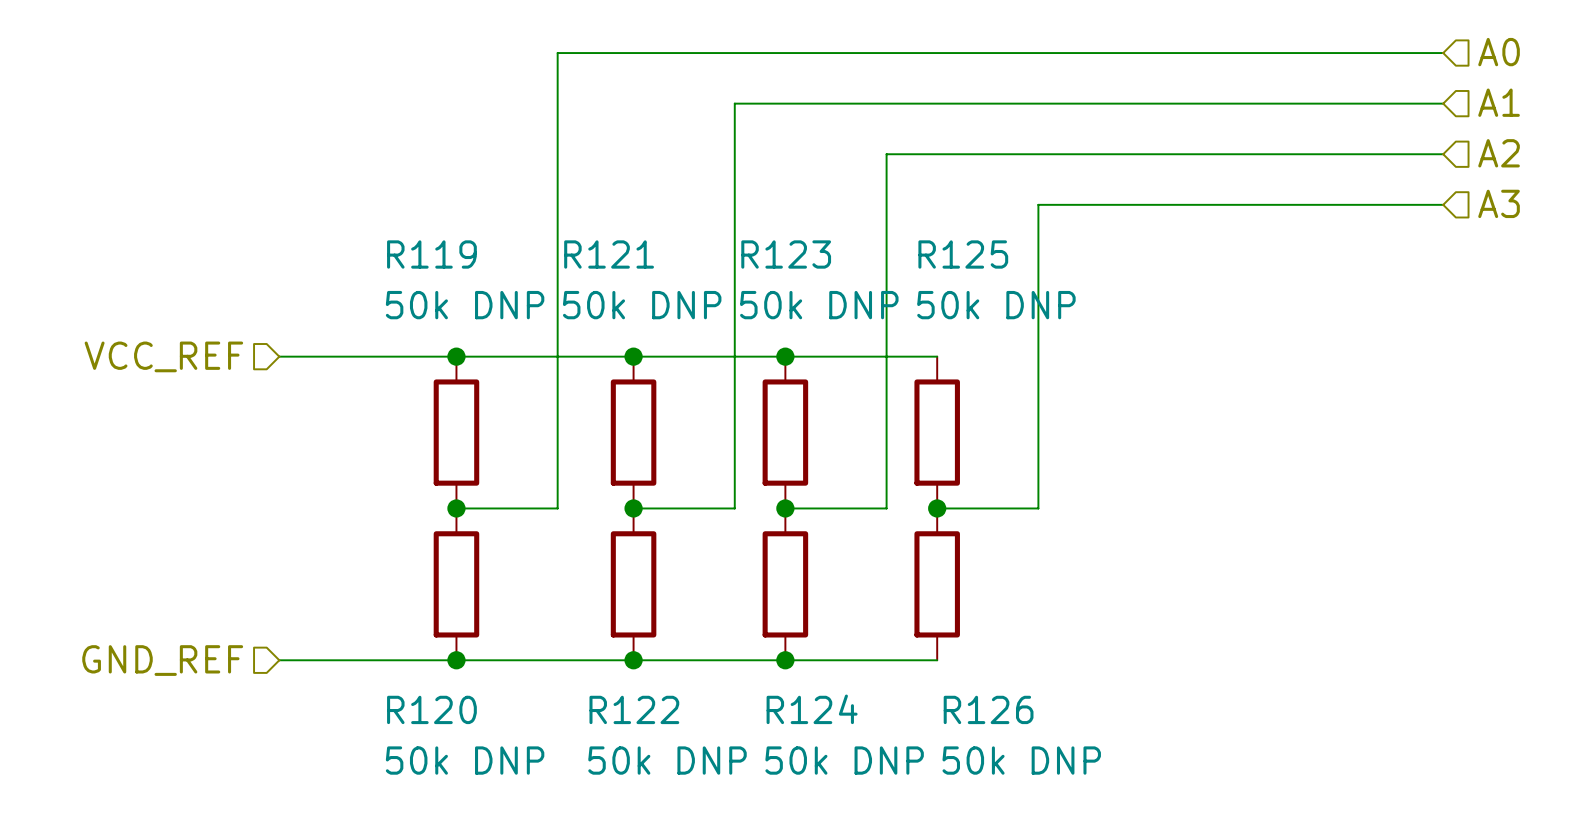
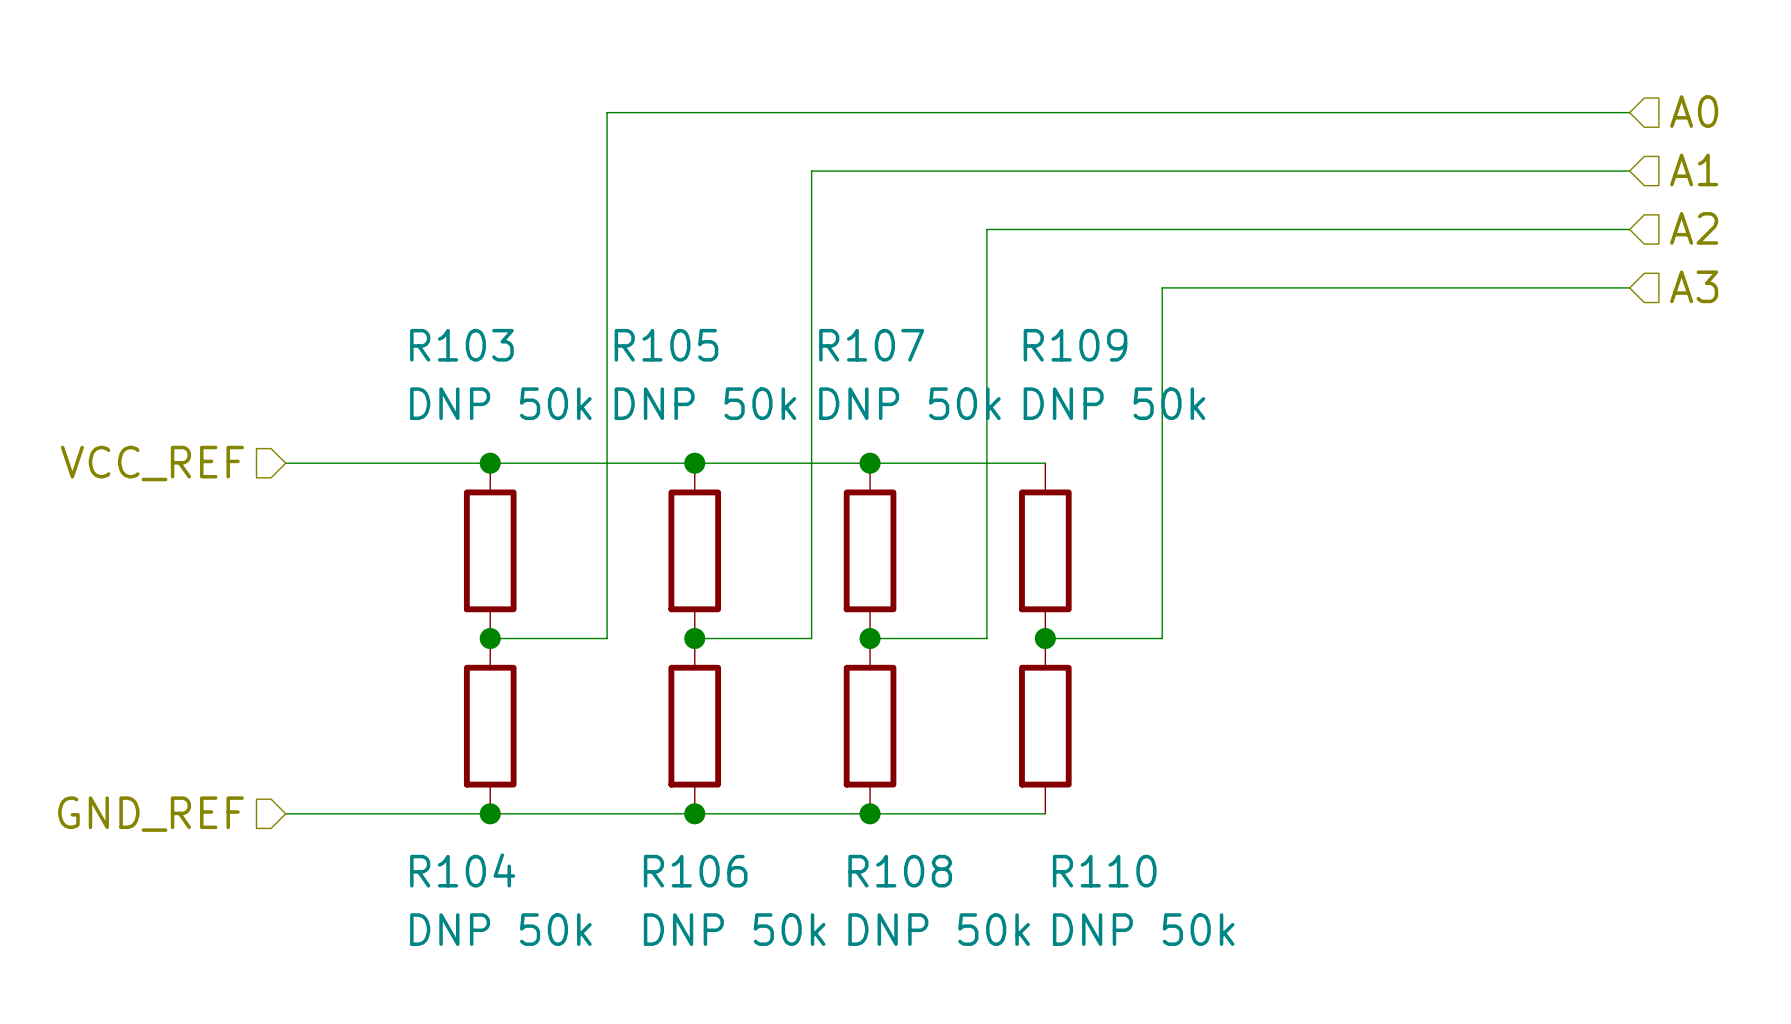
R119 name: R119 (431, 254) -> R103 (461, 345)
R121 name: R121 (609, 254) -> R105 (666, 345)
R123 name: R123 (786, 254) -> R107 (871, 345)
R125 name: R125 (963, 254) -> R109 (1075, 345)
R119 value: 50k DNP (465, 305) -> DNP 50k (500, 403)
R121 value: 50k DNP (642, 305) -> DNP 50k (705, 403)
R123 value: 50k DNP (819, 305) -> DNP 50k (909, 403)
R125 value: 50k DNP (996, 305) -> DNP 50k (1114, 403)
R120 name: R120 (431, 709) -> R104 (462, 870)
R122 name: R122 (634, 709) -> R106 (695, 871)
R124 name: R124 (812, 709) -> R108 (900, 871)
R126 name: R126 (988, 709) -> R110 (1104, 871)
R120 value: 50k DNP (465, 760) -> DNP 50k (500, 929)
R122 value: 50k DNP (667, 760) -> DNP 50k (734, 929)
R124 value: 50k DNP (844, 760) -> DNP 50k (939, 929)
R126 value: 50k DNP (1021, 760) -> DNP 50k (1143, 929)

